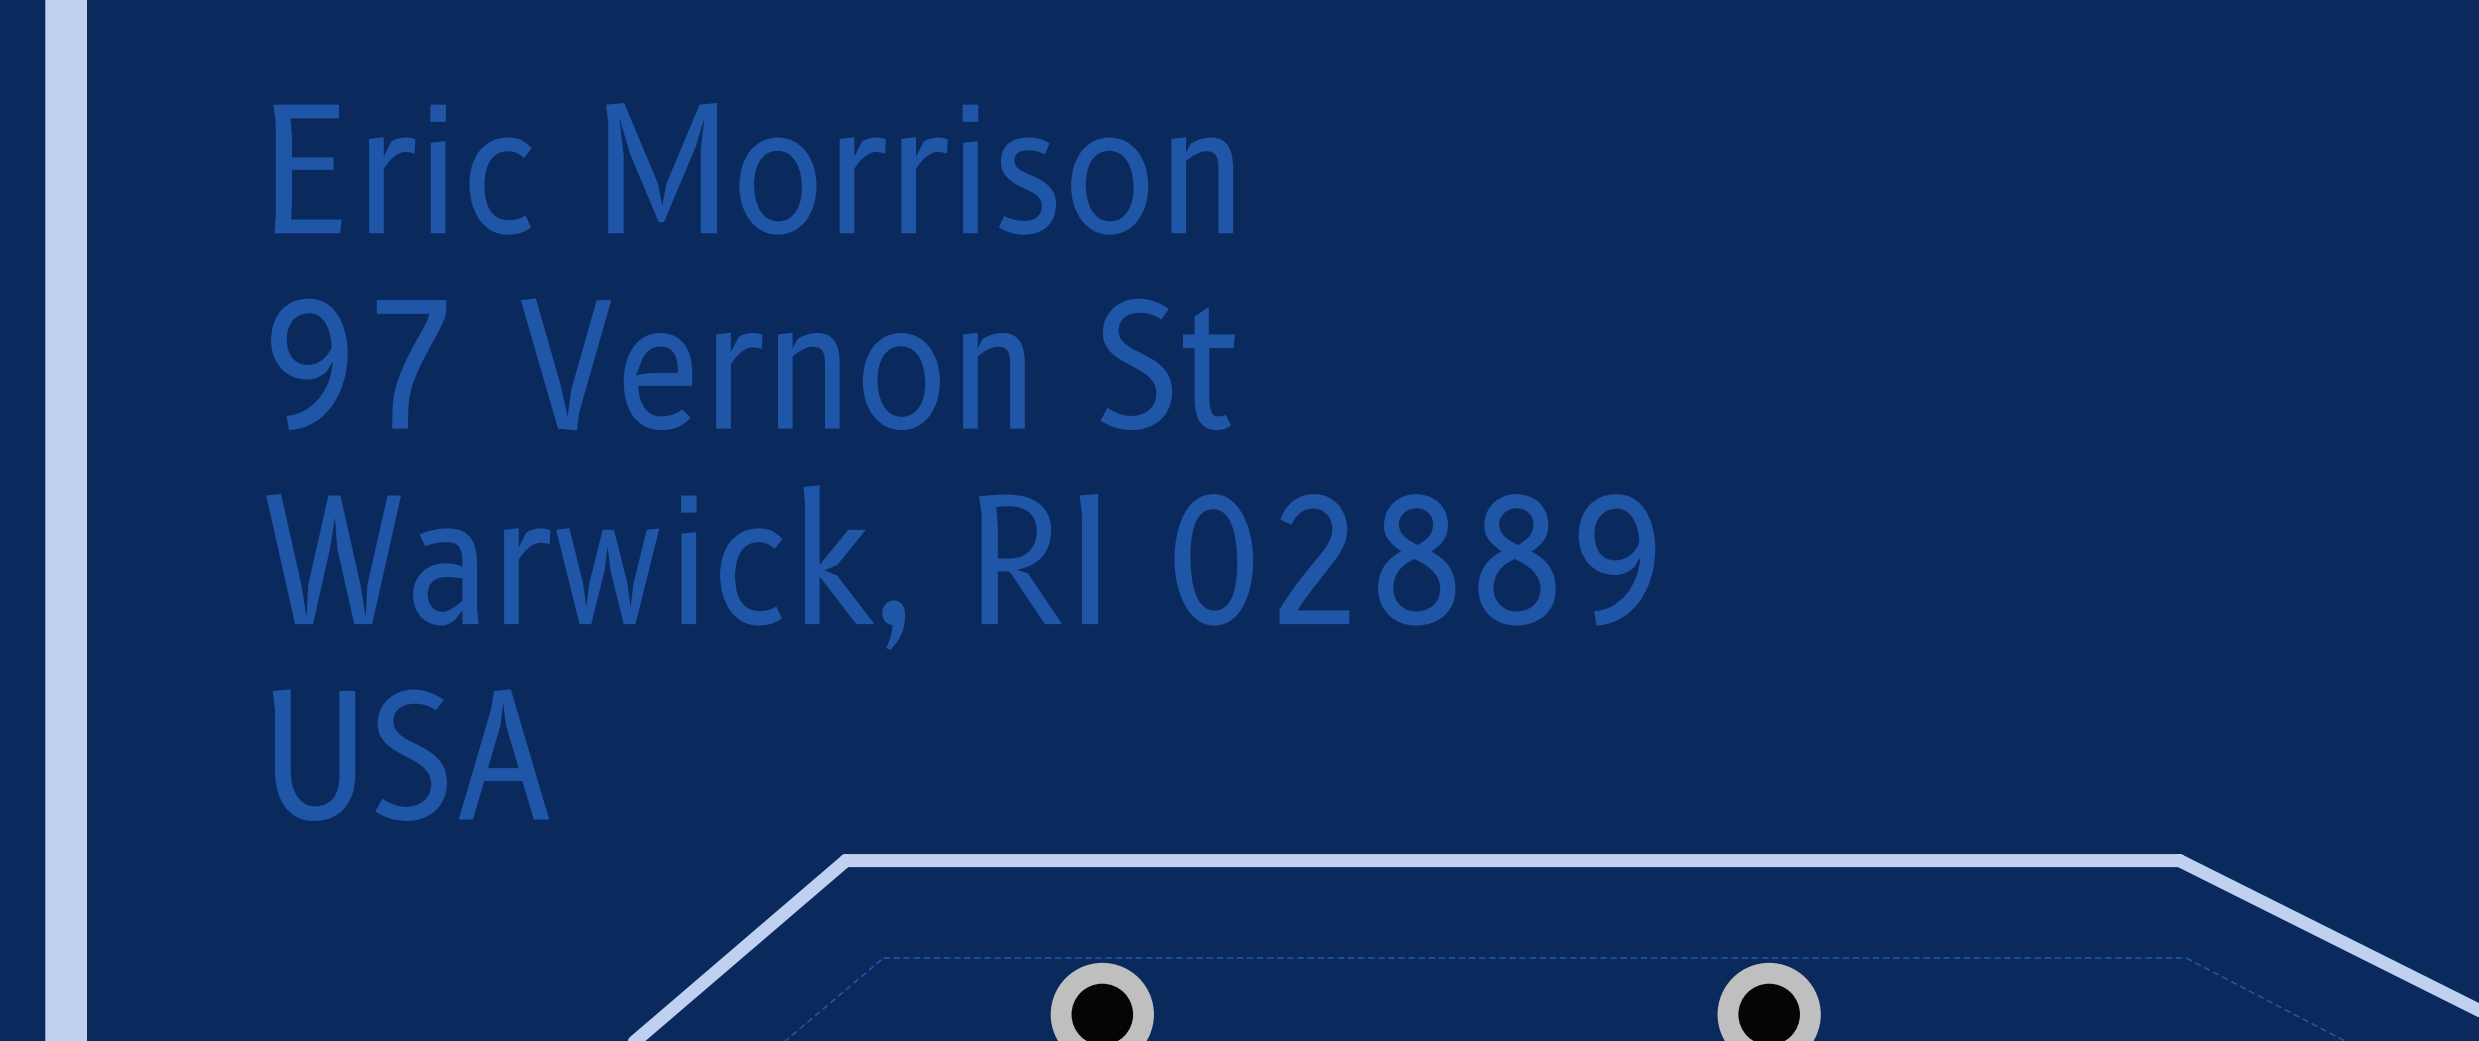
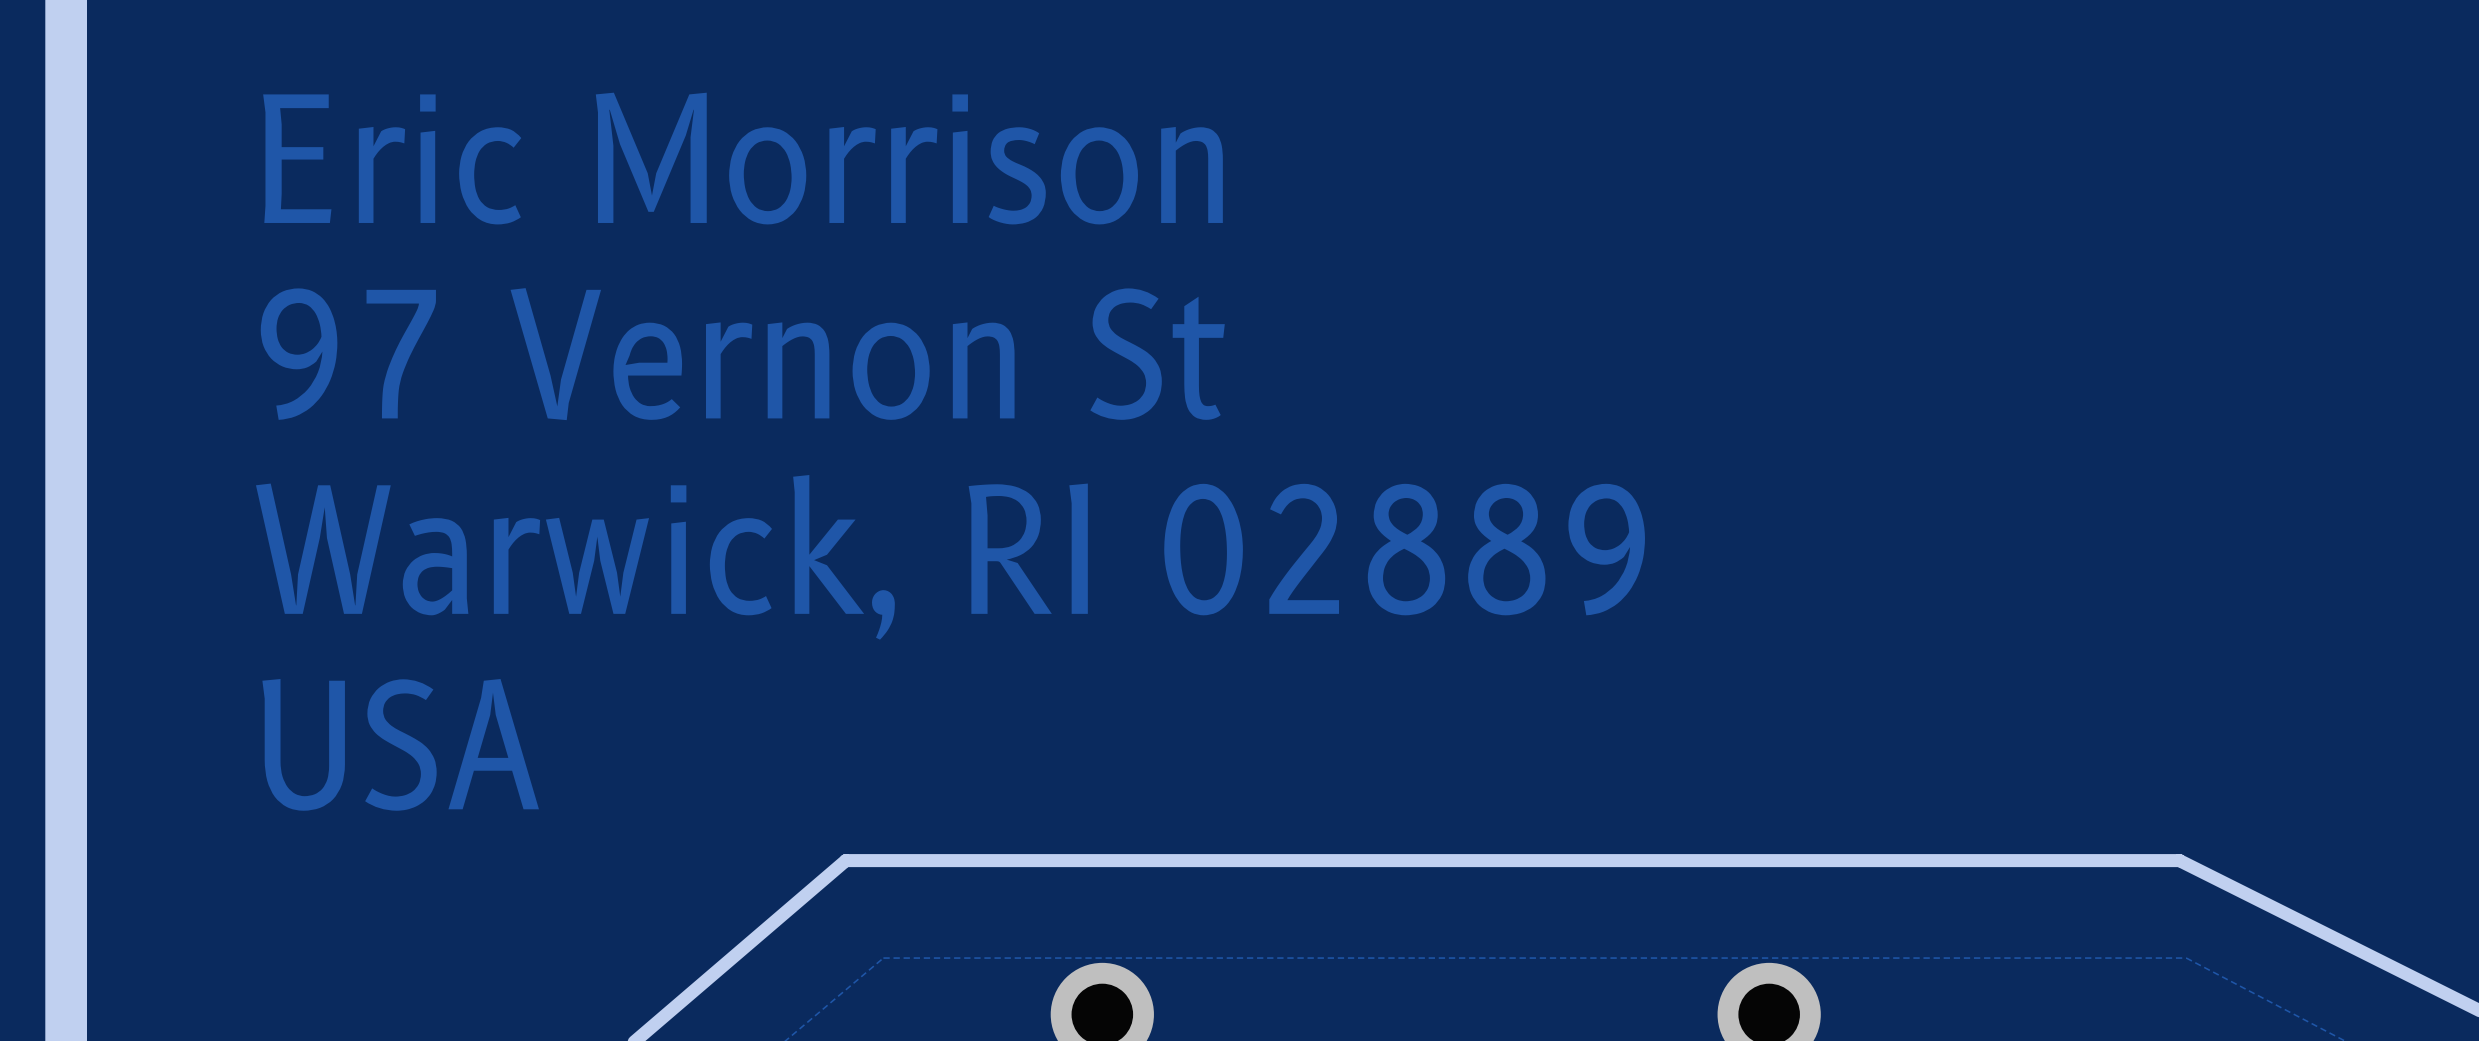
text position: Eric Morrison (753, 168) -> Eric Morrison (743, 158)
text position: 97 Vernon St (753, 364) -> 97 Vernon St (742, 354)
text position: Warwick, RI 02889 (960, 567) -> Warwick, RI 02889 (950, 557)
text position: USA (410, 755) -> USA (400, 744)

